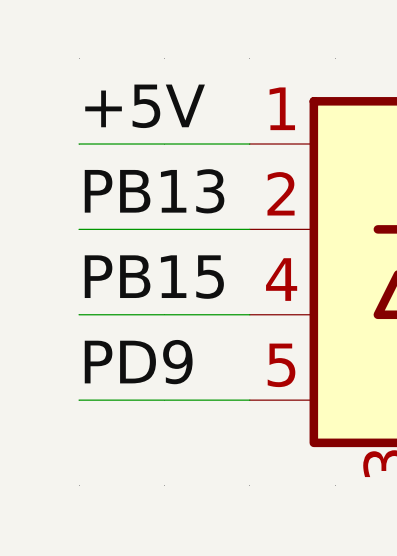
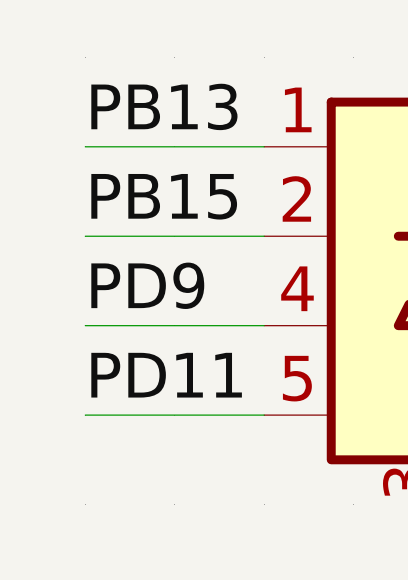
label: +5V (145, 106) -> PB13 (164, 106)
label: PB13 (154, 191) -> PB15 (164, 196)
label: PB15 (154, 277) -> PD9 (147, 285)
label: PD9 (138, 362) -> PD11 (166, 375)

